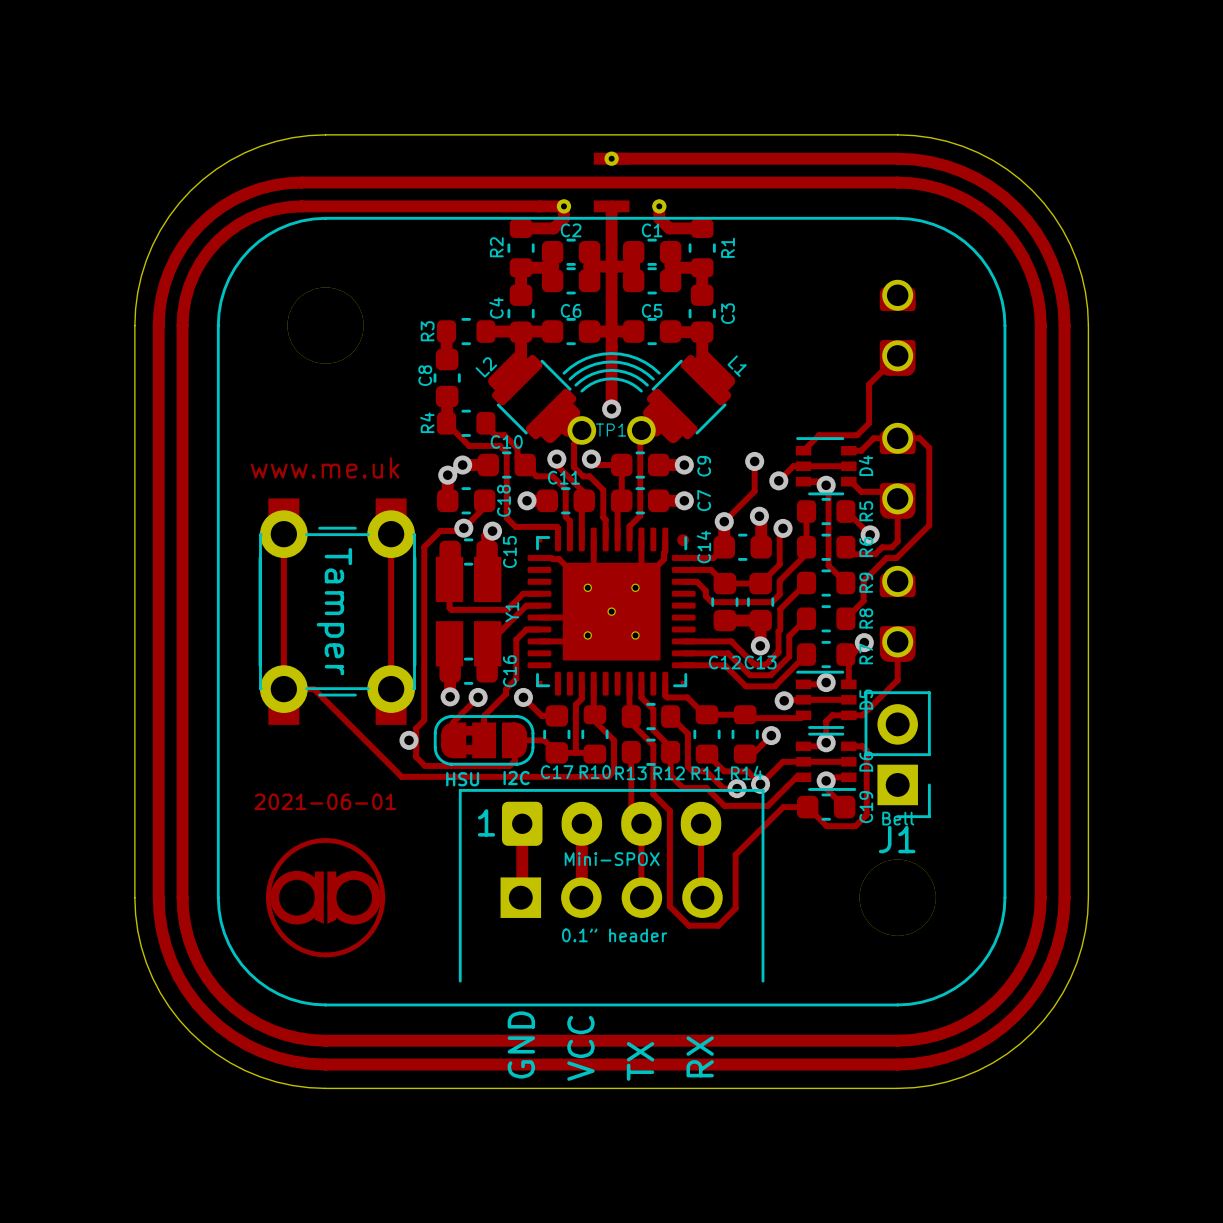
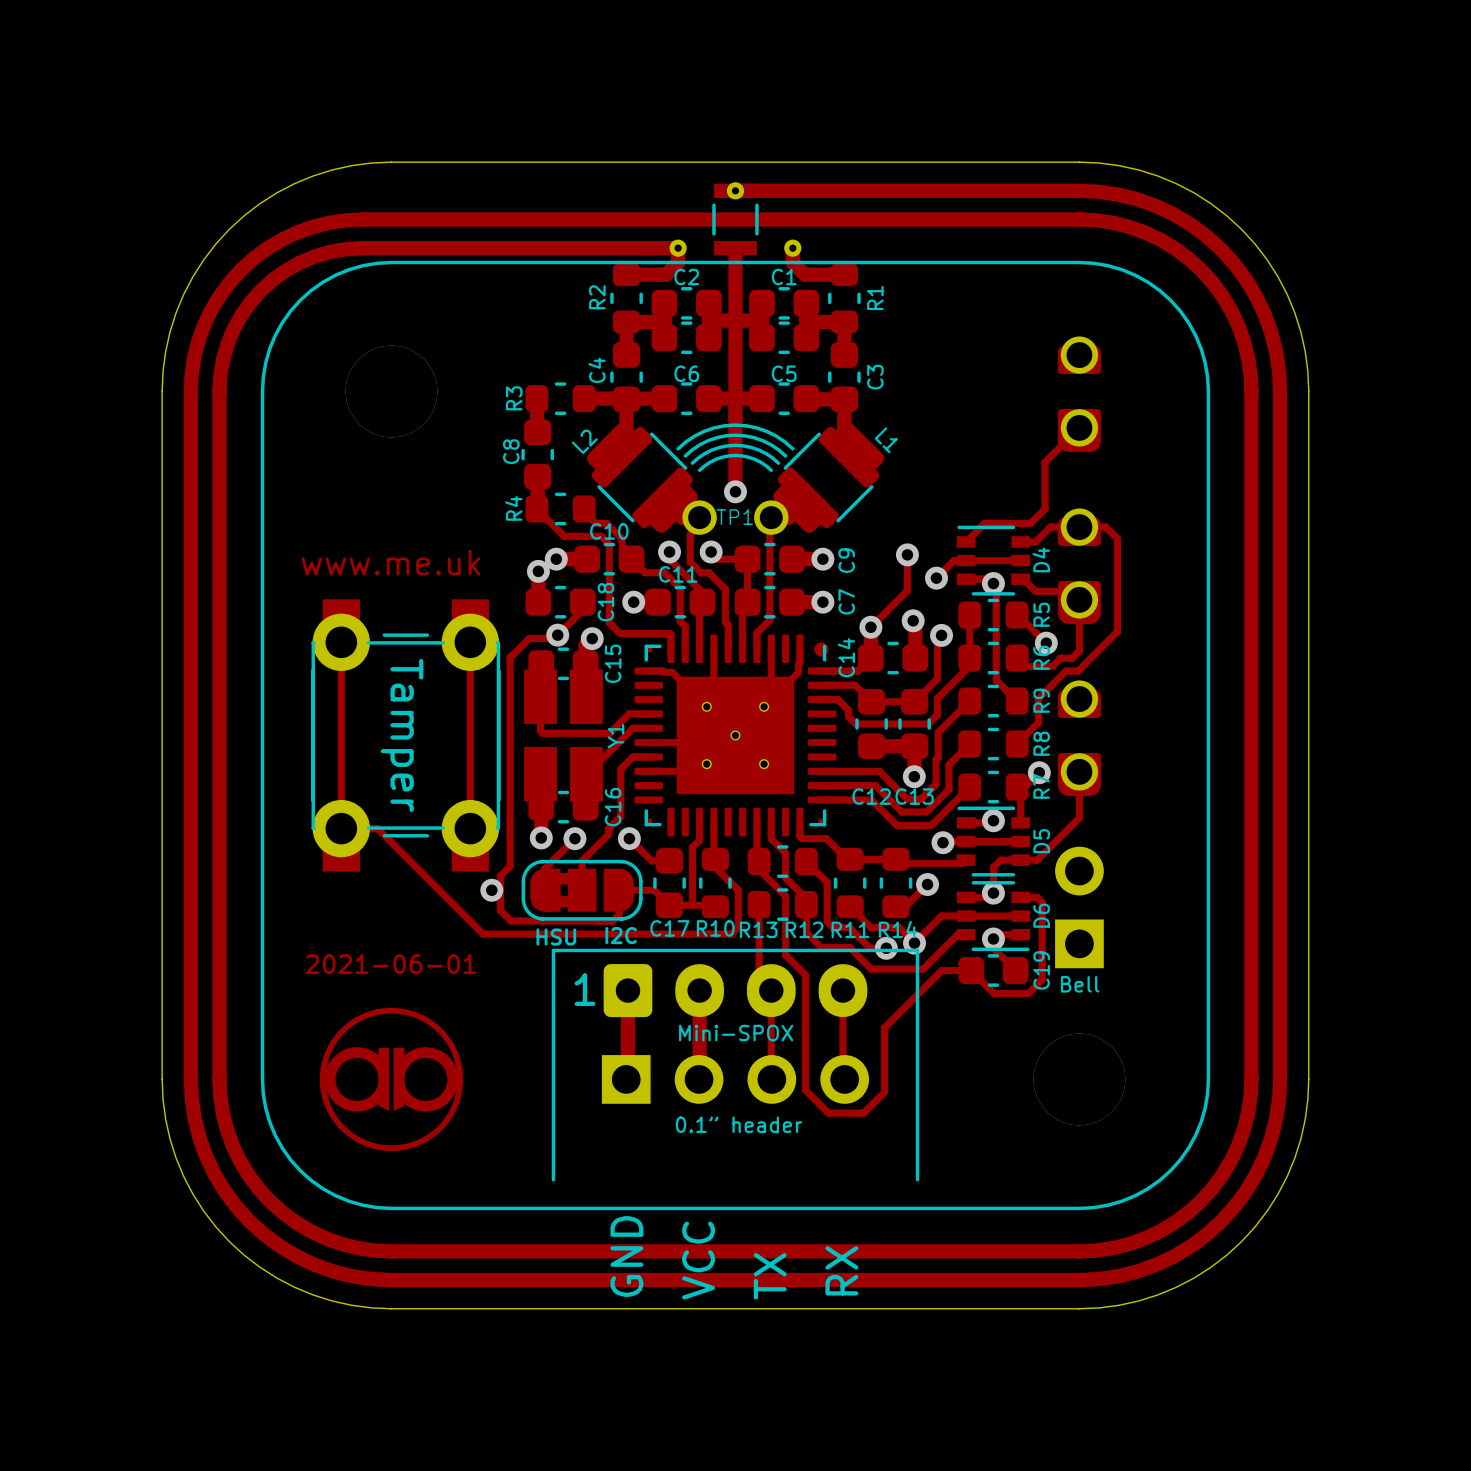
part footprint: [152, 151, 1071, 1071] -> [183, 182, 1288, 1288]
J1: (897, 754) -> none

